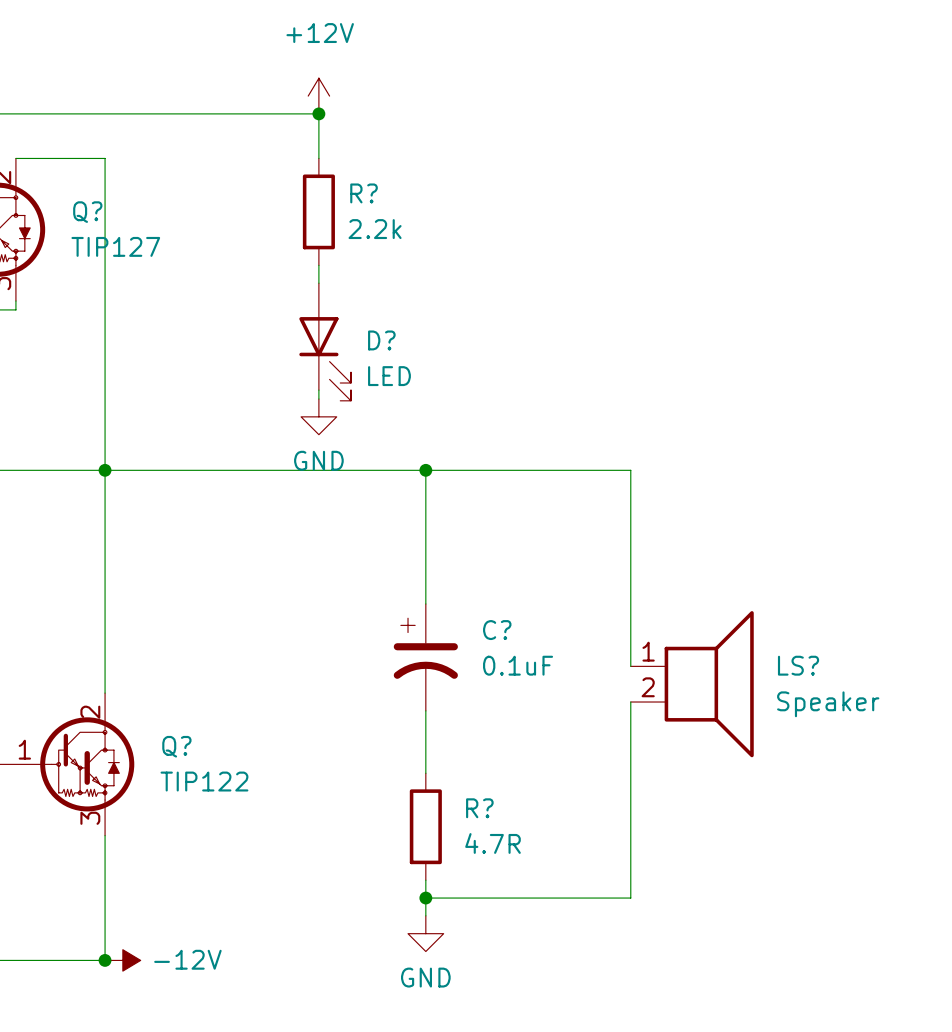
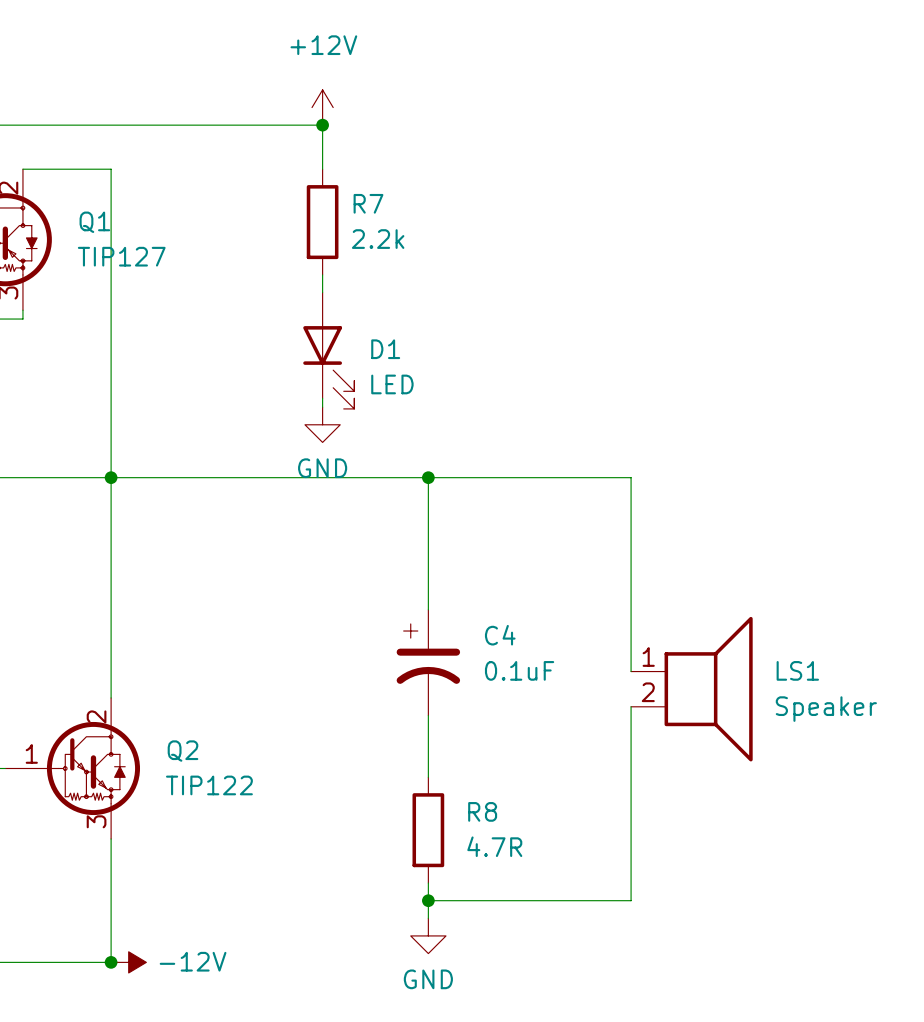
R? name: R? (364, 193) -> R7 (368, 203)
Q? name: Q? (87, 212) -> Q1 (94, 222)
D? name: D? (381, 340) -> D1 (385, 349)
C? name: C? (497, 630) -> C4 (500, 635)
LS? name: LS? (798, 665) -> LS1 (797, 670)
Q? name: Q? (176, 746) -> Q2 (182, 751)
R? name: R? (479, 808) -> R8 (482, 811)

